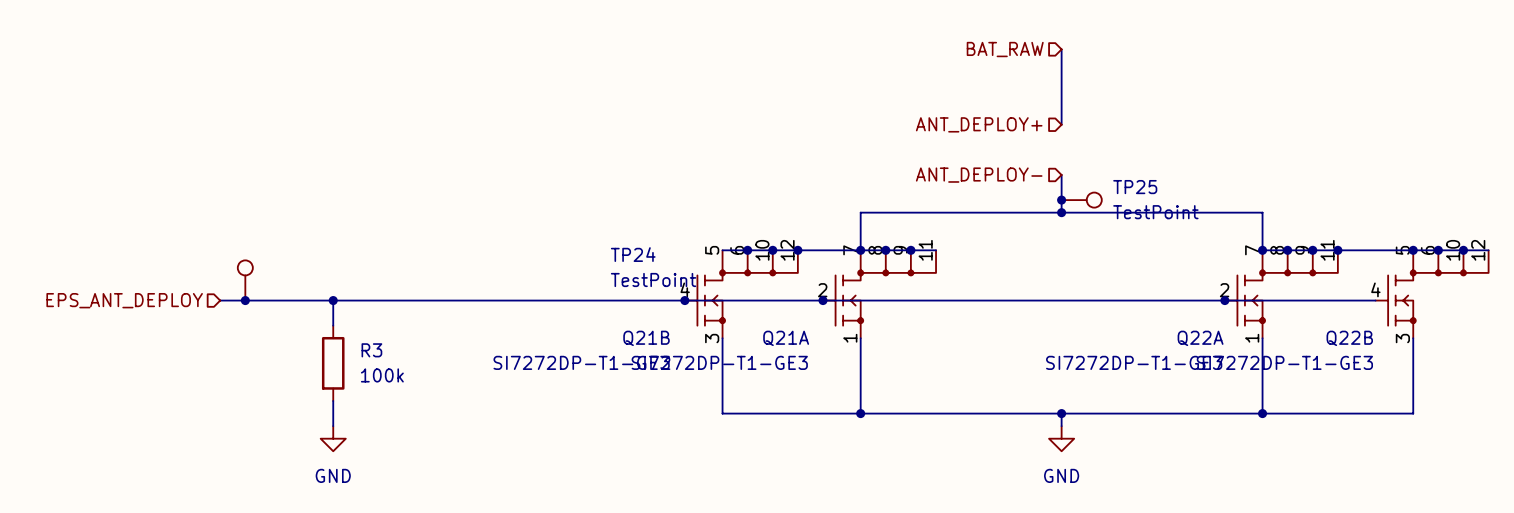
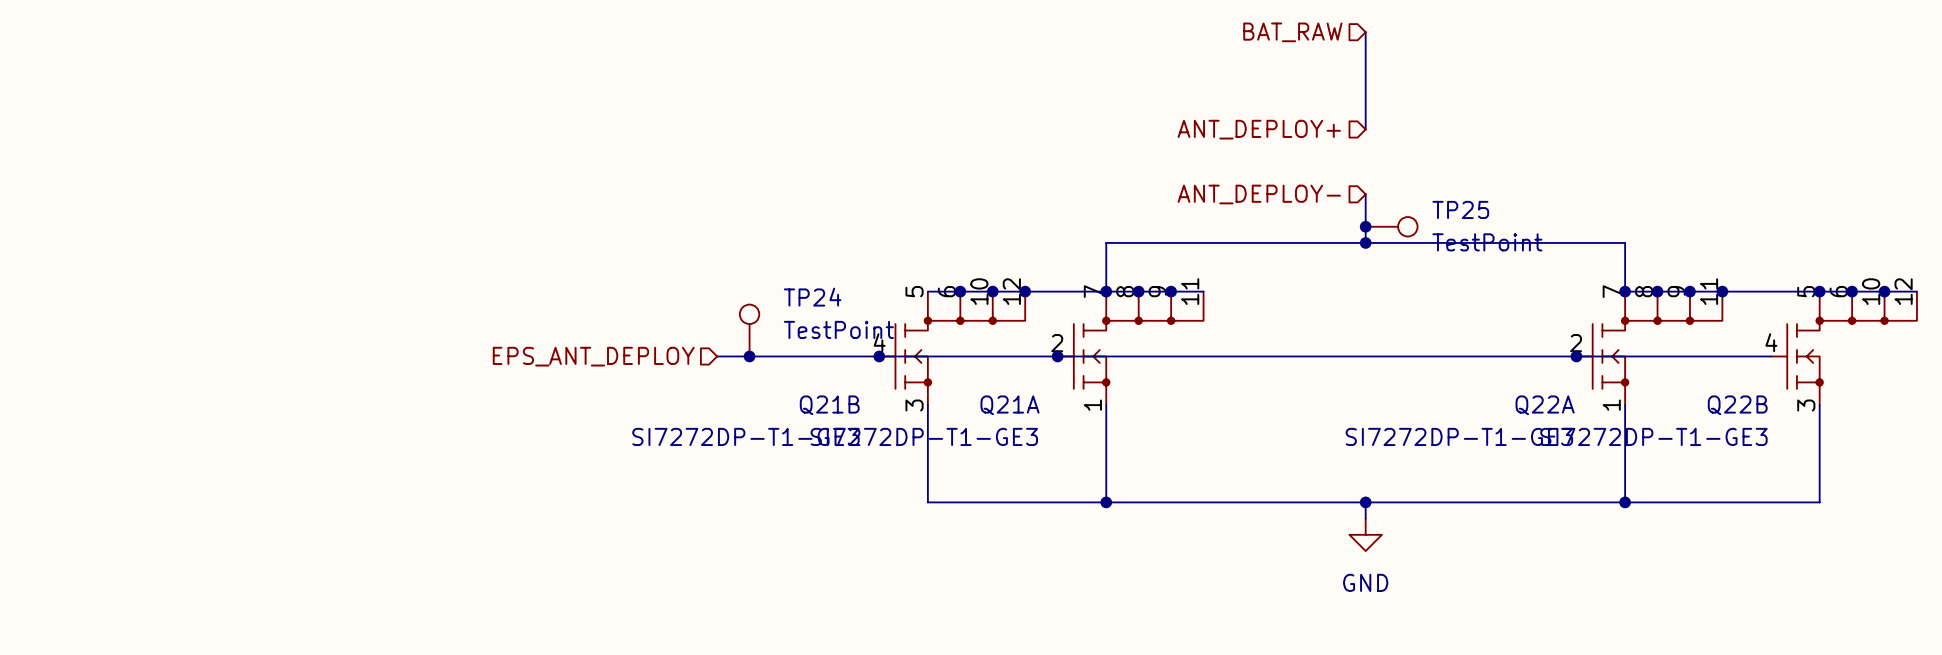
TP24 position: (245, 280) -> (749, 330)
hierarchical label: EPS_ANT_DEPLOY (124, 300) -> none
wire: (220, 300) (559, 300) -> none
junction: (245, 300) -> none
wire: (333, 300) (333, 325) -> none
junction: (333, 300) -> none
hierarchical label: none -> EPS_ANT_DEPLOY (593, 356)
junction: none -> (749, 356)
R3: 100k (333, 363) -> none
wire: (333, 401) (333, 426) -> none
power symbol: GND (333, 438) -> none

